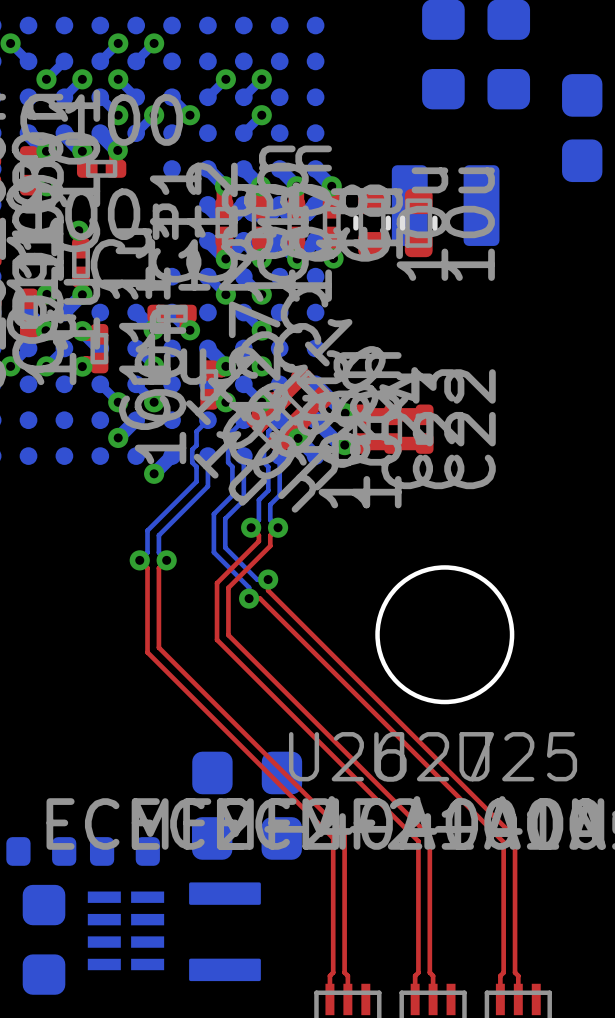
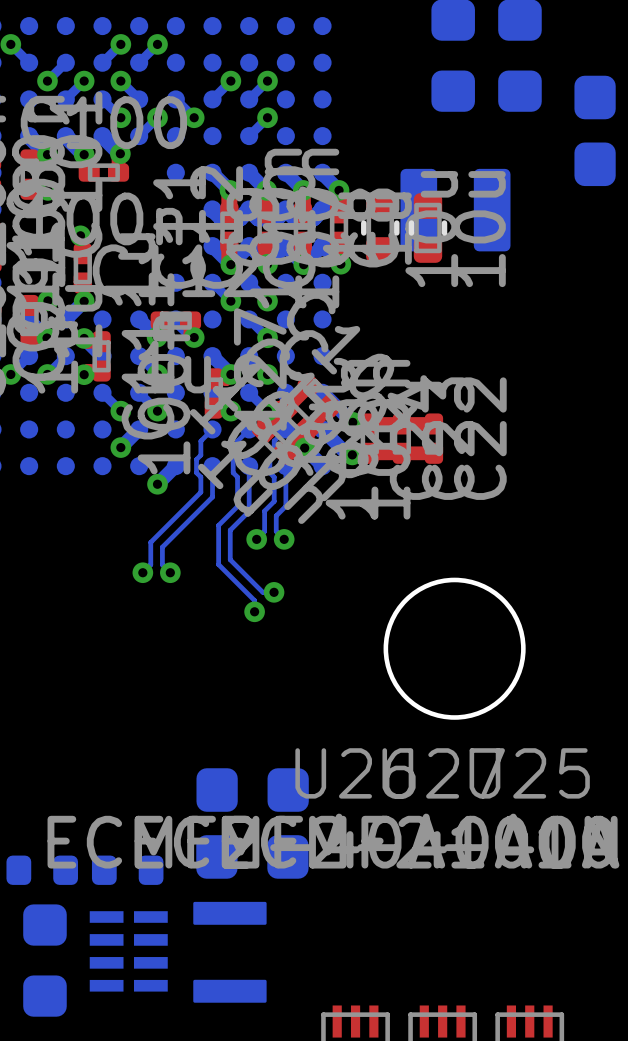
top track: (251, 527) (258, 535) (258, 541) (217, 583) (217, 639) (418, 841) (418, 972) (415, 975) (415, 999) -> none
top track: (278, 527) (270, 535) (270, 545) (228, 587) (228, 635) (429, 836) (429, 972) (433, 975) (433, 999) -> none
top track: (139, 560) (147, 568) (147, 652) (333, 838) (333, 972) (329, 975) (329, 999) -> none
top track: (166, 560) (158, 568) (158, 647) (344, 833) (344, 972) (347, 975) (347, 999) -> none
top track: (268, 579) (268, 590) (515, 837) (515, 972) (518, 975) (518, 999) -> none
top track: (249, 598) (260, 598) (503, 842) (503, 972) (500, 975) (500, 999) -> none

